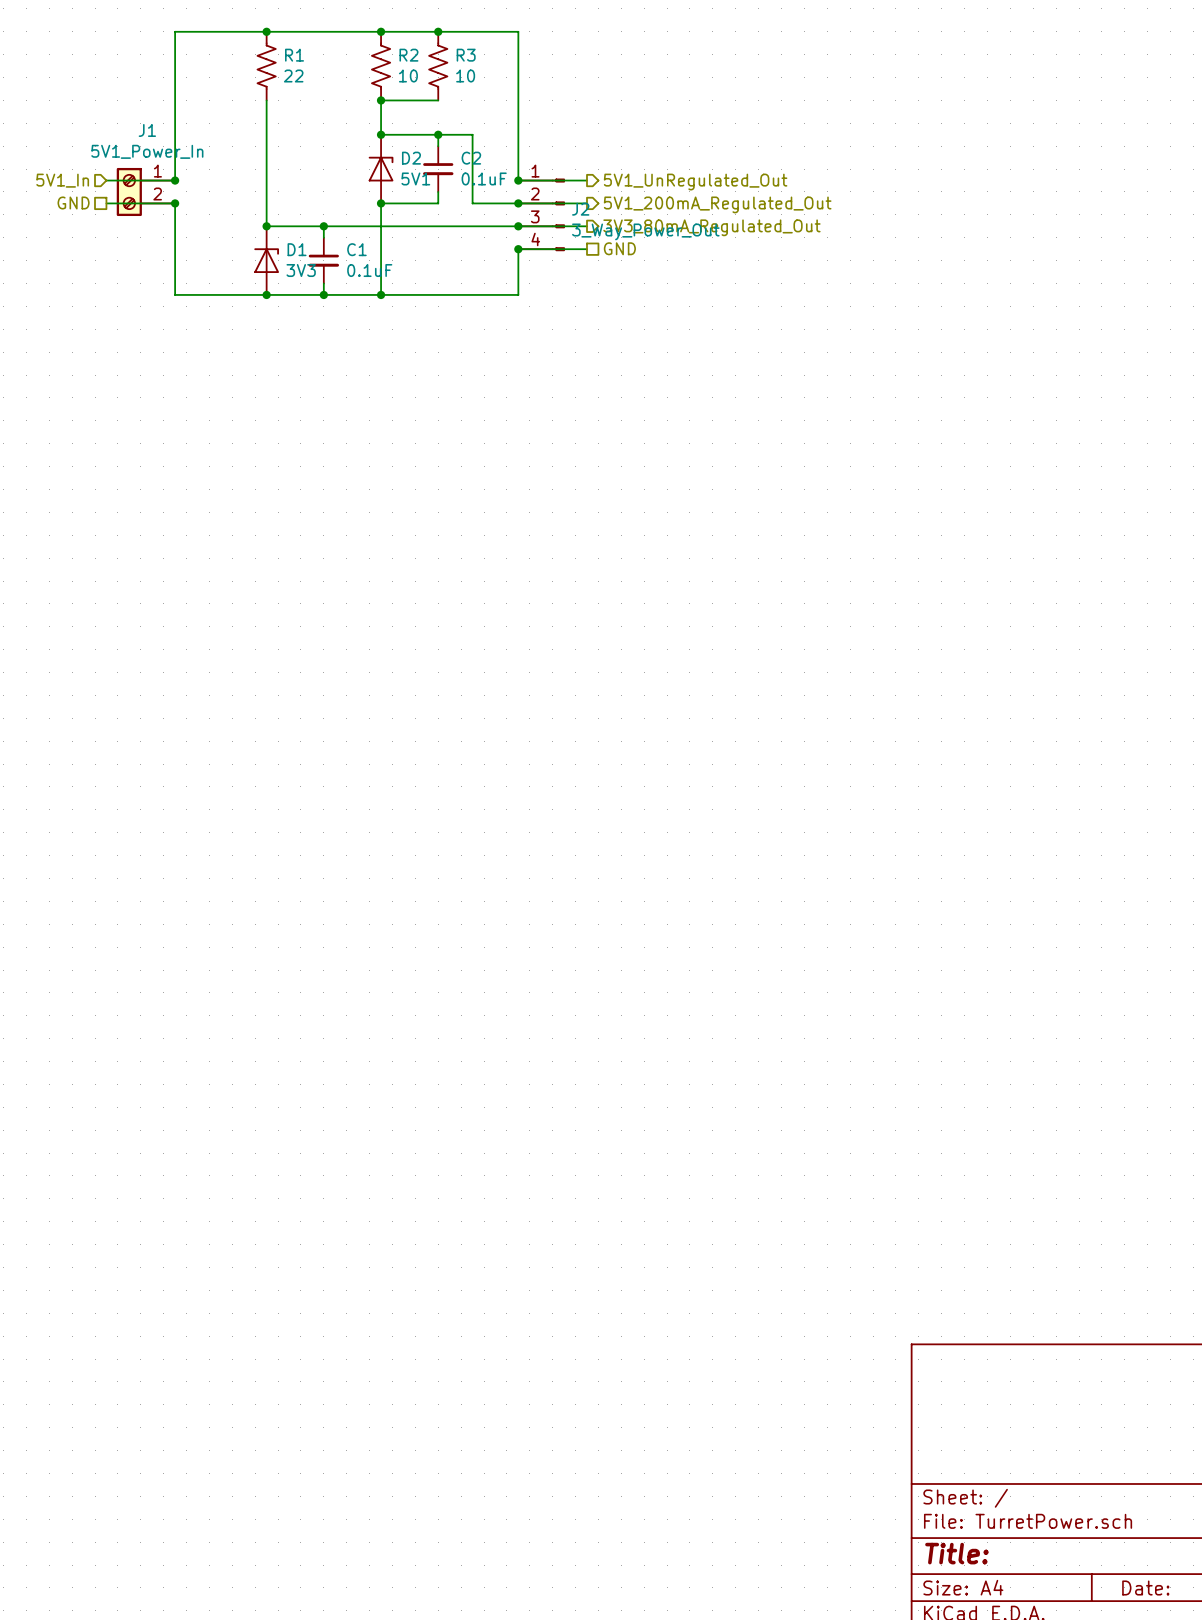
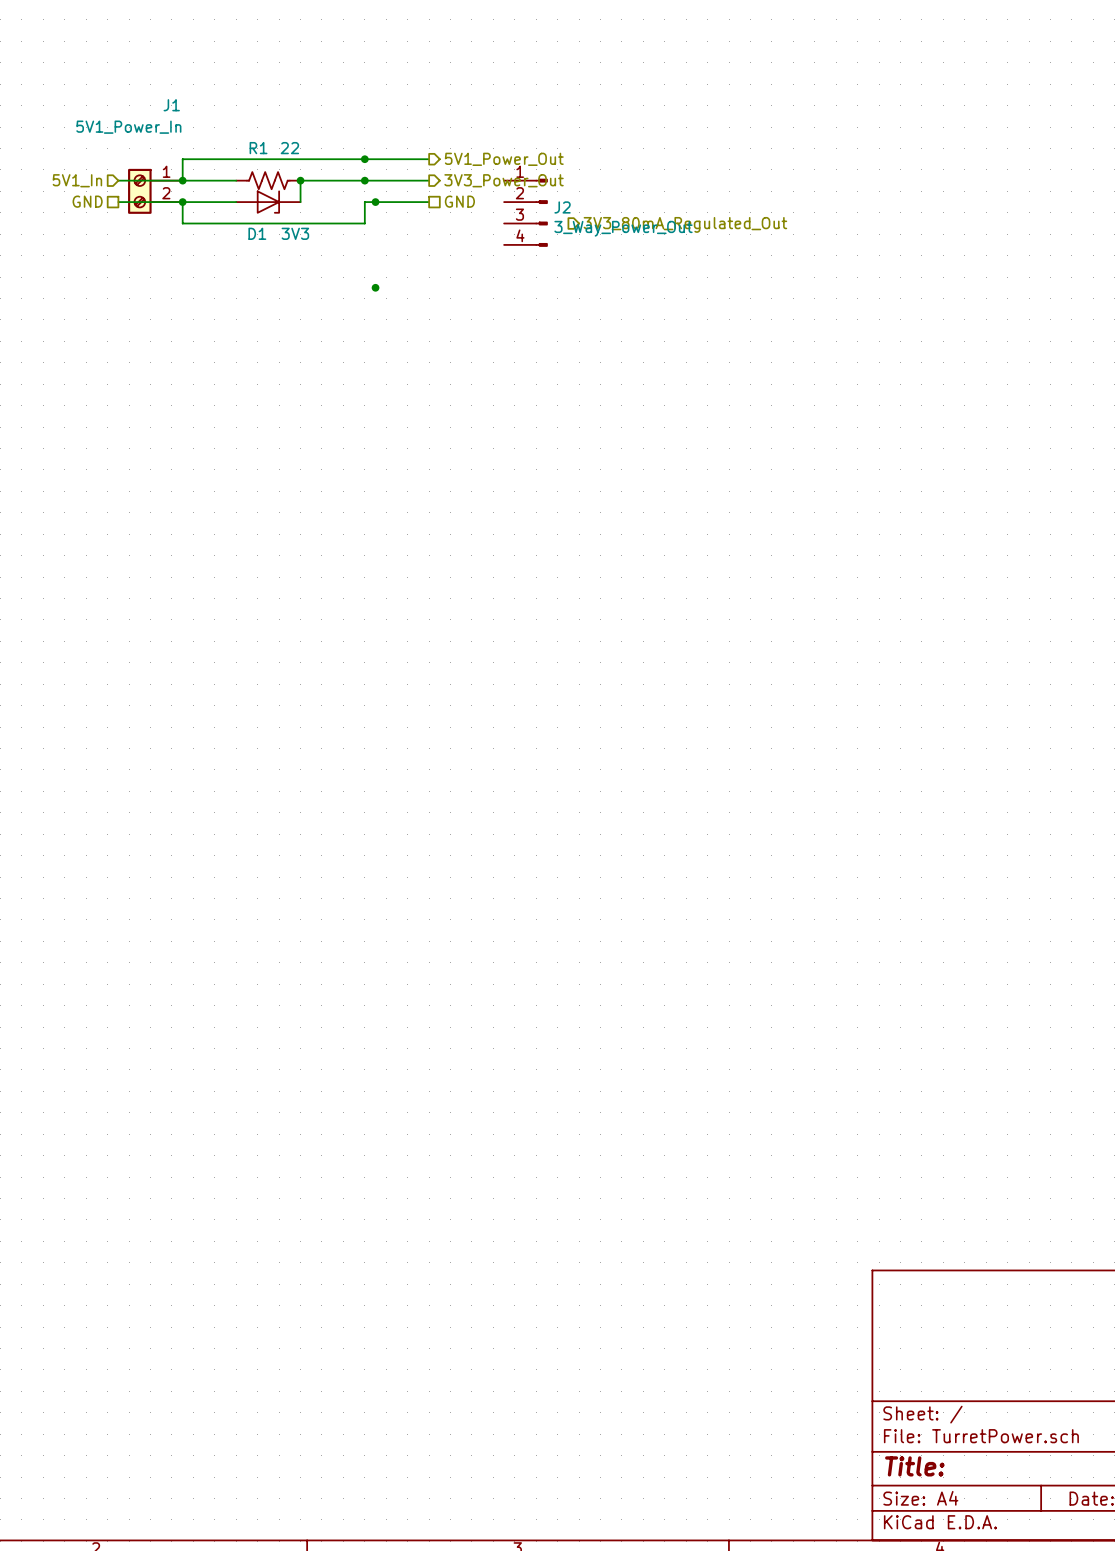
junction: (266, 31) -> none
junction: (381, 31) -> none
junction: (438, 31) -> none
R1 name position: R1 (294, 55) -> R1 (258, 148)
R1 rotation: 0° (266, 66) -> 90° clockwise (268, 180)
R1 position: (266, 66) -> (268, 180)
R2: 10 (381, 66) -> none
R3: 10 (438, 66) -> none
R1 value position: 22 (293, 75) -> 22 (289, 148)
wire: (266, 100) (266, 226) -> (182, 223) (268, 223)
junction: (381, 100) -> none
wire: (438, 100) (381, 100) (381, 134) (472, 134) (472, 203) (587, 203) -> none
J1 name position: J1 (147, 130) -> J1 (171, 105)
junction: (381, 134) -> none
wire: (438, 134) (438, 146) -> none
junction: (438, 134) -> none
J1 value position: 5V1_Power_In (147, 151) -> 5V1_Power_In (128, 127)
wire: (175, 157) (175, 31) (518, 31) (518, 180) (587, 180) -> (182, 159) (429, 159)
junction: none -> (364, 159)
hierarchical label: none -> 5V1_Power_Out (504, 159)
D2: 5V1 (381, 169) -> none
C2: 0.1uF (438, 169) -> none
wire: none -> (182, 180) (236, 180)
junction: none -> (300, 180)
junction: none -> (364, 180)
wire: none -> (429, 180) (300, 180) (300, 202)
hierarchical label: none -> 3V3_Power_Out (504, 180)
junction: (518, 180) -> none
hierarchical label: 5V1_UnRegulated_Out (695, 182) -> none
wire: none -> (182, 202) (236, 202)
wire: (381, 203) (381, 294) -> (375, 202) (364, 202) (364, 223)
junction: (518, 203) -> none
hierarchical label: 5V1_200mA_Regulated_Out (717, 204) -> none
wire: (175, 226) (175, 294) (518, 294) (518, 249) (587, 249) -> none
junction: (266, 226) -> none
wire: (323, 226) (323, 237) -> none
junction: (323, 226) -> none
wire: (369, 226) (587, 226) -> none
junction: (518, 226) -> none
hierarchical label position: GND (619, 248) -> GND (459, 201)
D1 name position: D1 (297, 249) -> D1 (257, 233)
junction: (518, 249) -> none
D1 rotation: 0° (266, 260) -> 90° clockwise (268, 202)
D1 position: (266, 260) -> (268, 202)
C1: 0.1uF (323, 260) -> none
D1 value position: 3V3 (301, 270) -> 3V3 (295, 233)
wire: (323, 283) (323, 294) -> none
junction: (266, 294) -> none
junction: (323, 294) -> none

